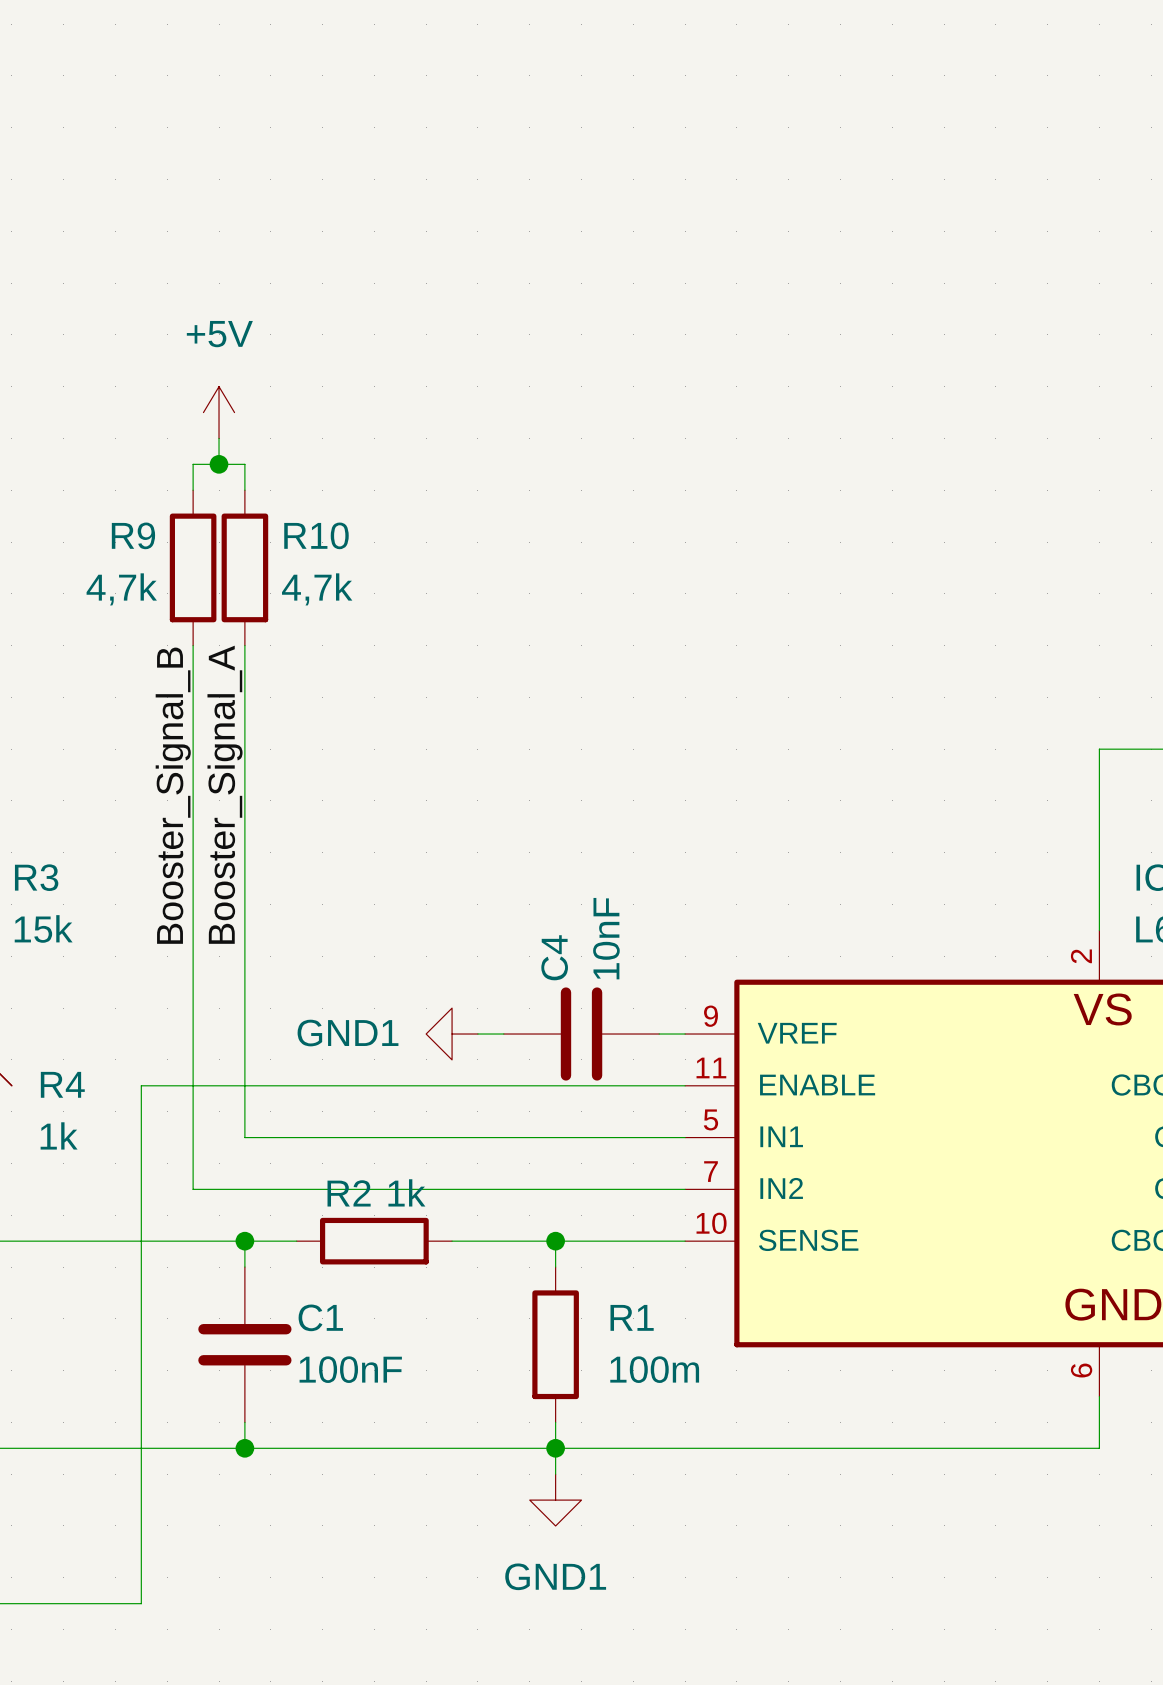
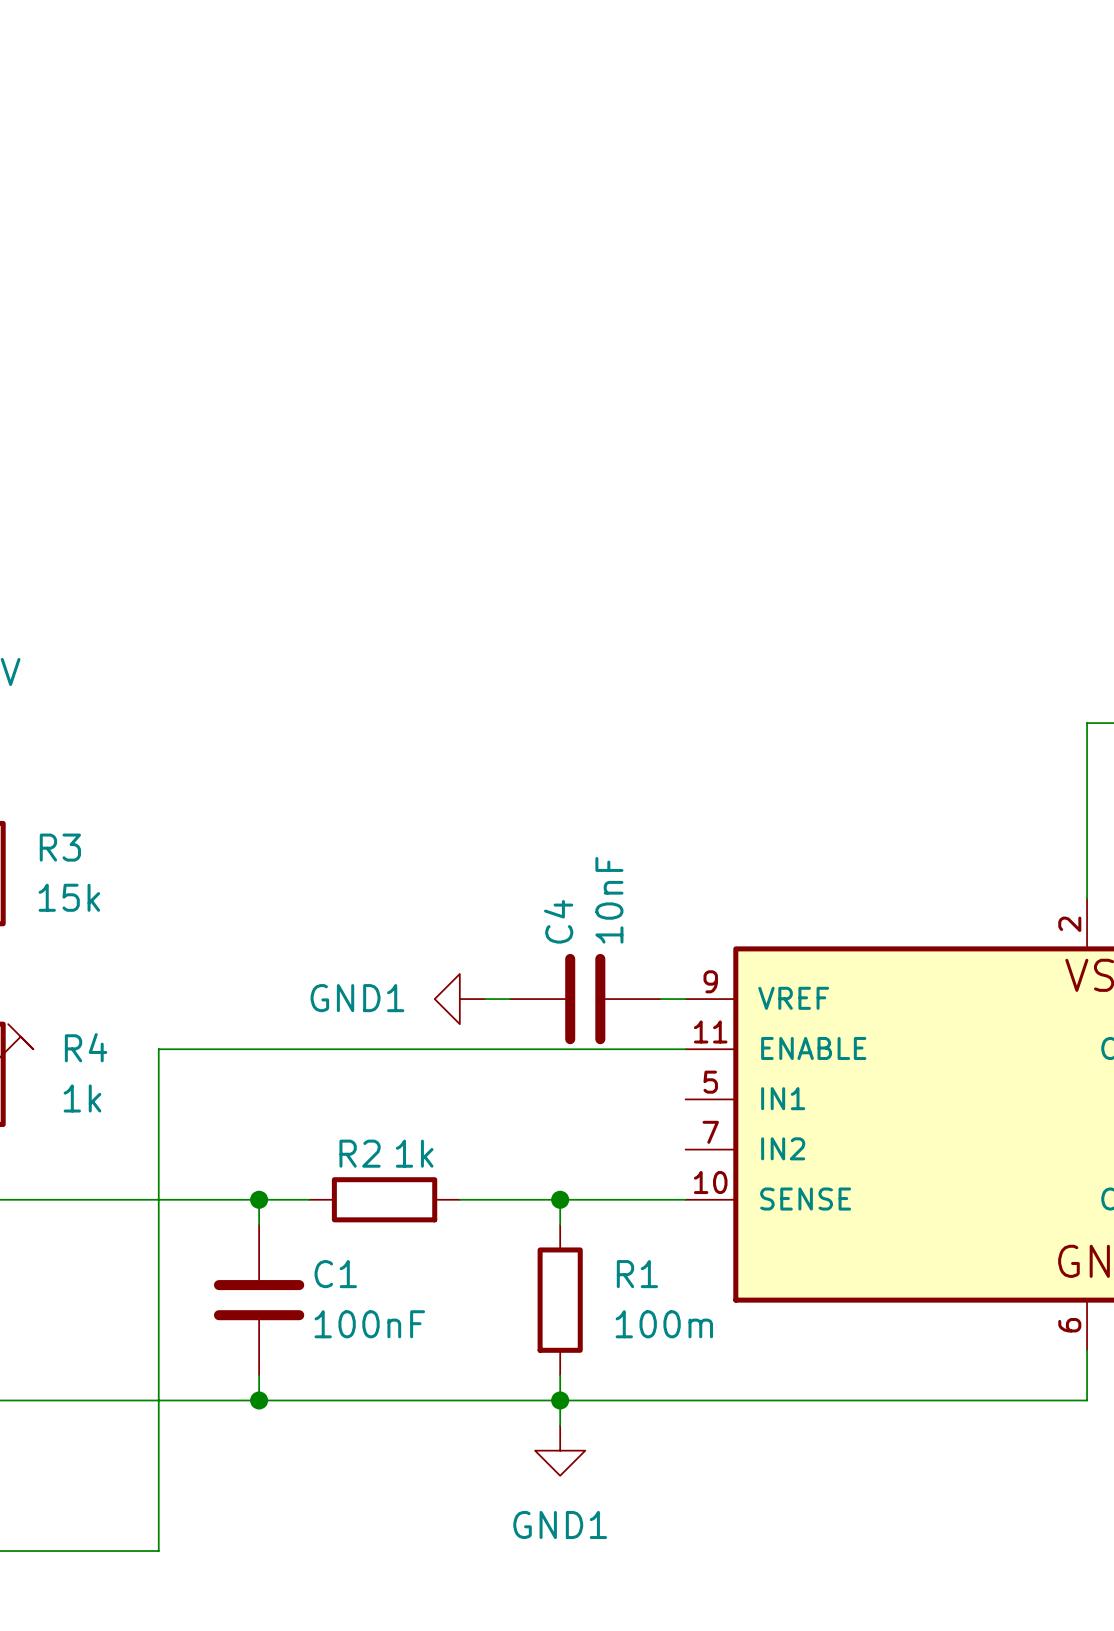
power symbol: +5V (219, 412) -> none
wire: (219, 438) (219, 464) -> none
junction: (219, 464) -> none
wire: (193, 490) (193, 464) (244, 464) (244, 490) -> none
R9: 4,7k (193, 567) -> none
R10: 4,7k (244, 567) -> none
wire: (193, 645) (193, 1189) (685, 1189) -> none
wire: (244, 645) (244, 1137) (685, 1137) -> none
label: Booster_Signal_A (225, 794) -> none
label: Booster_Signal_B (173, 795) -> none

